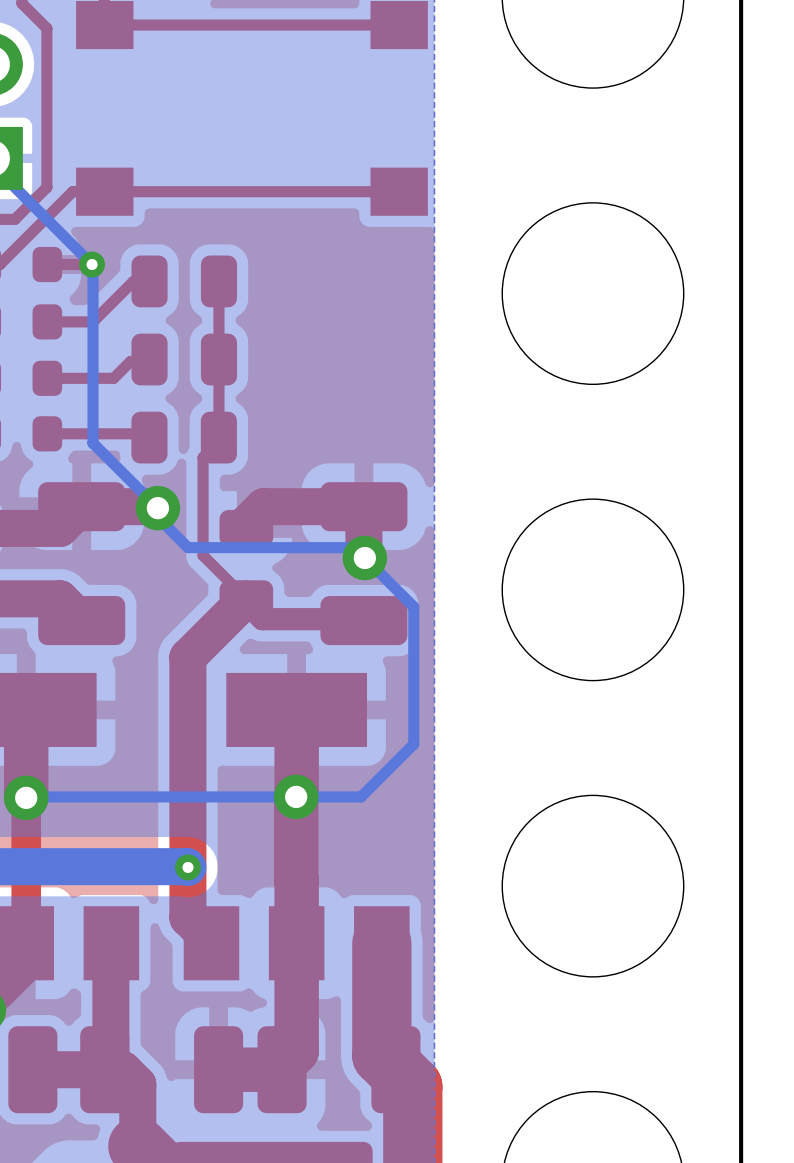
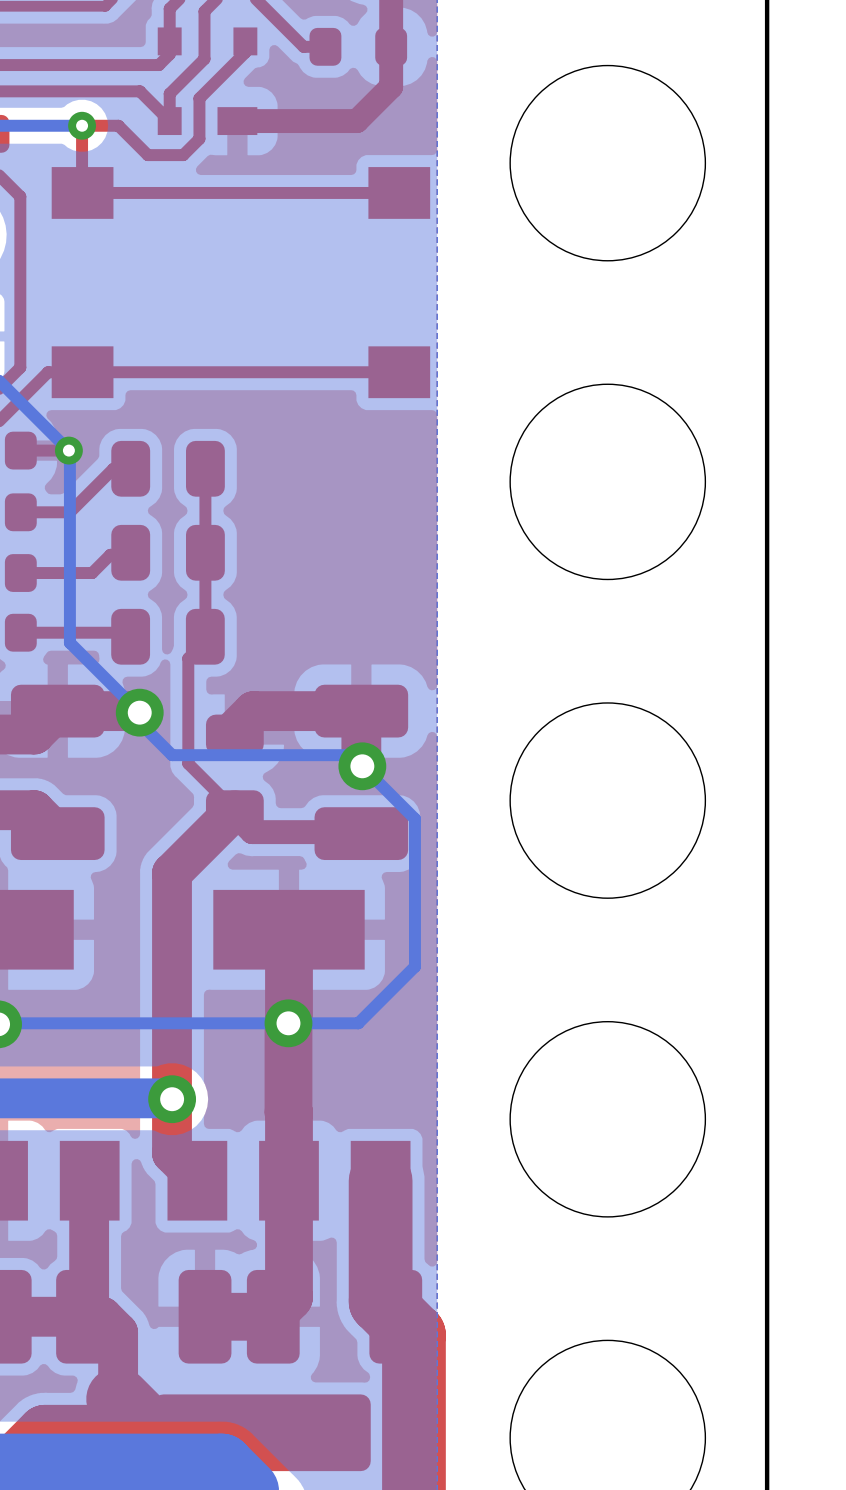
via size: [175, 854, 201, 881] -> [148, 1075, 197, 1124]

